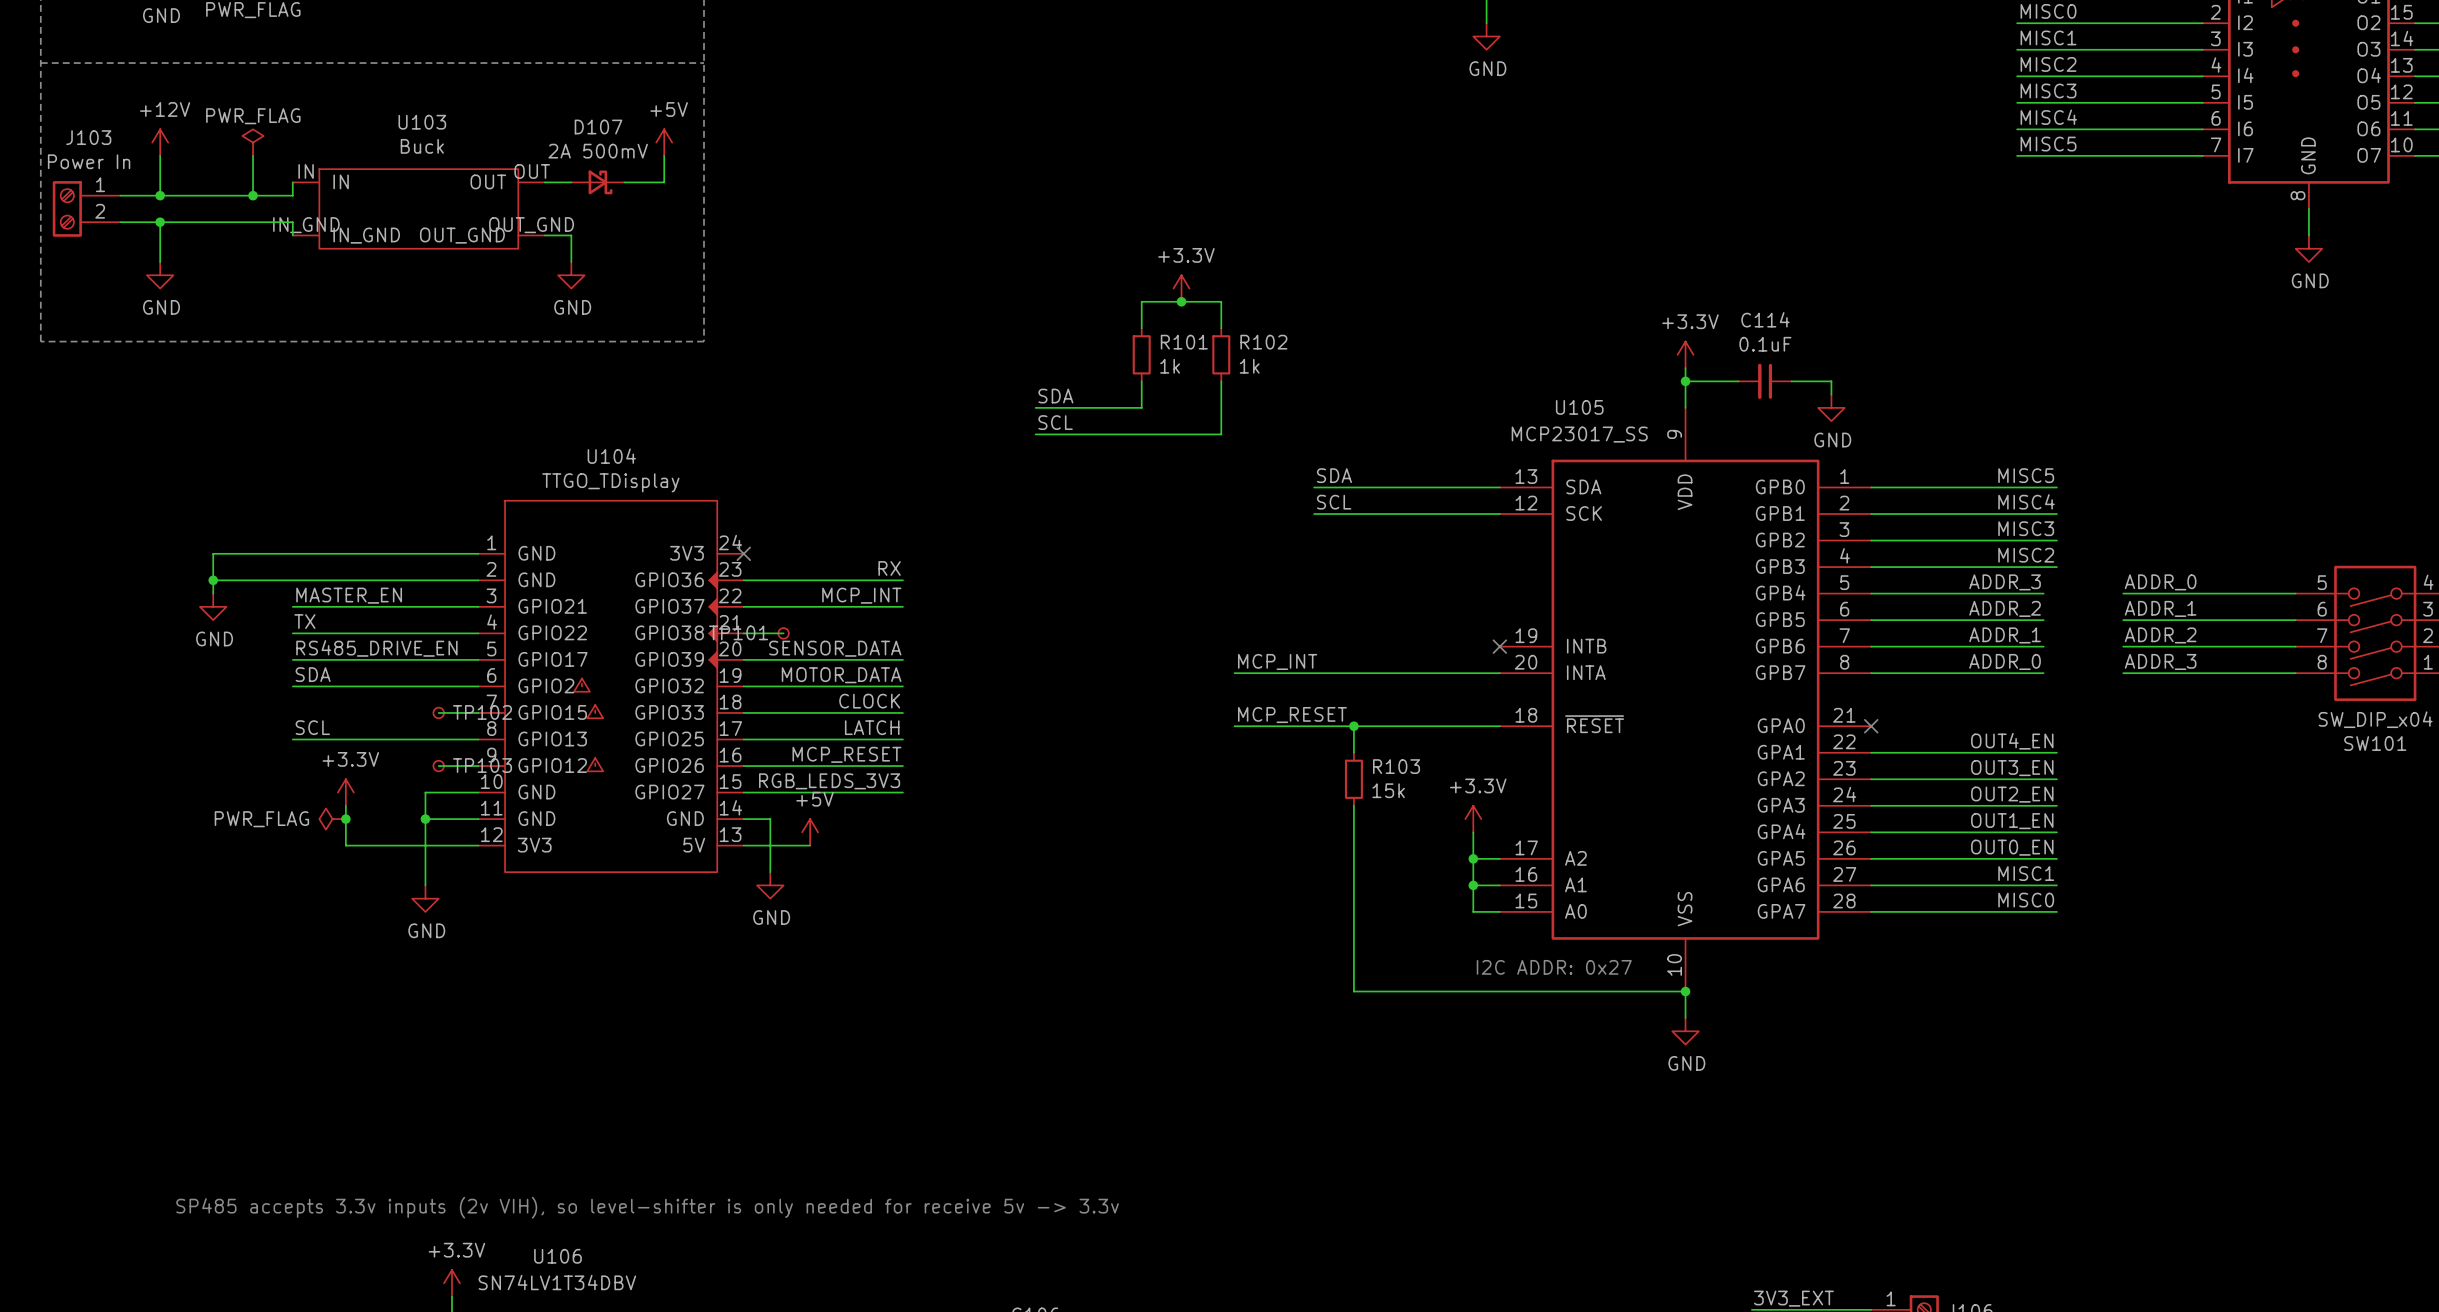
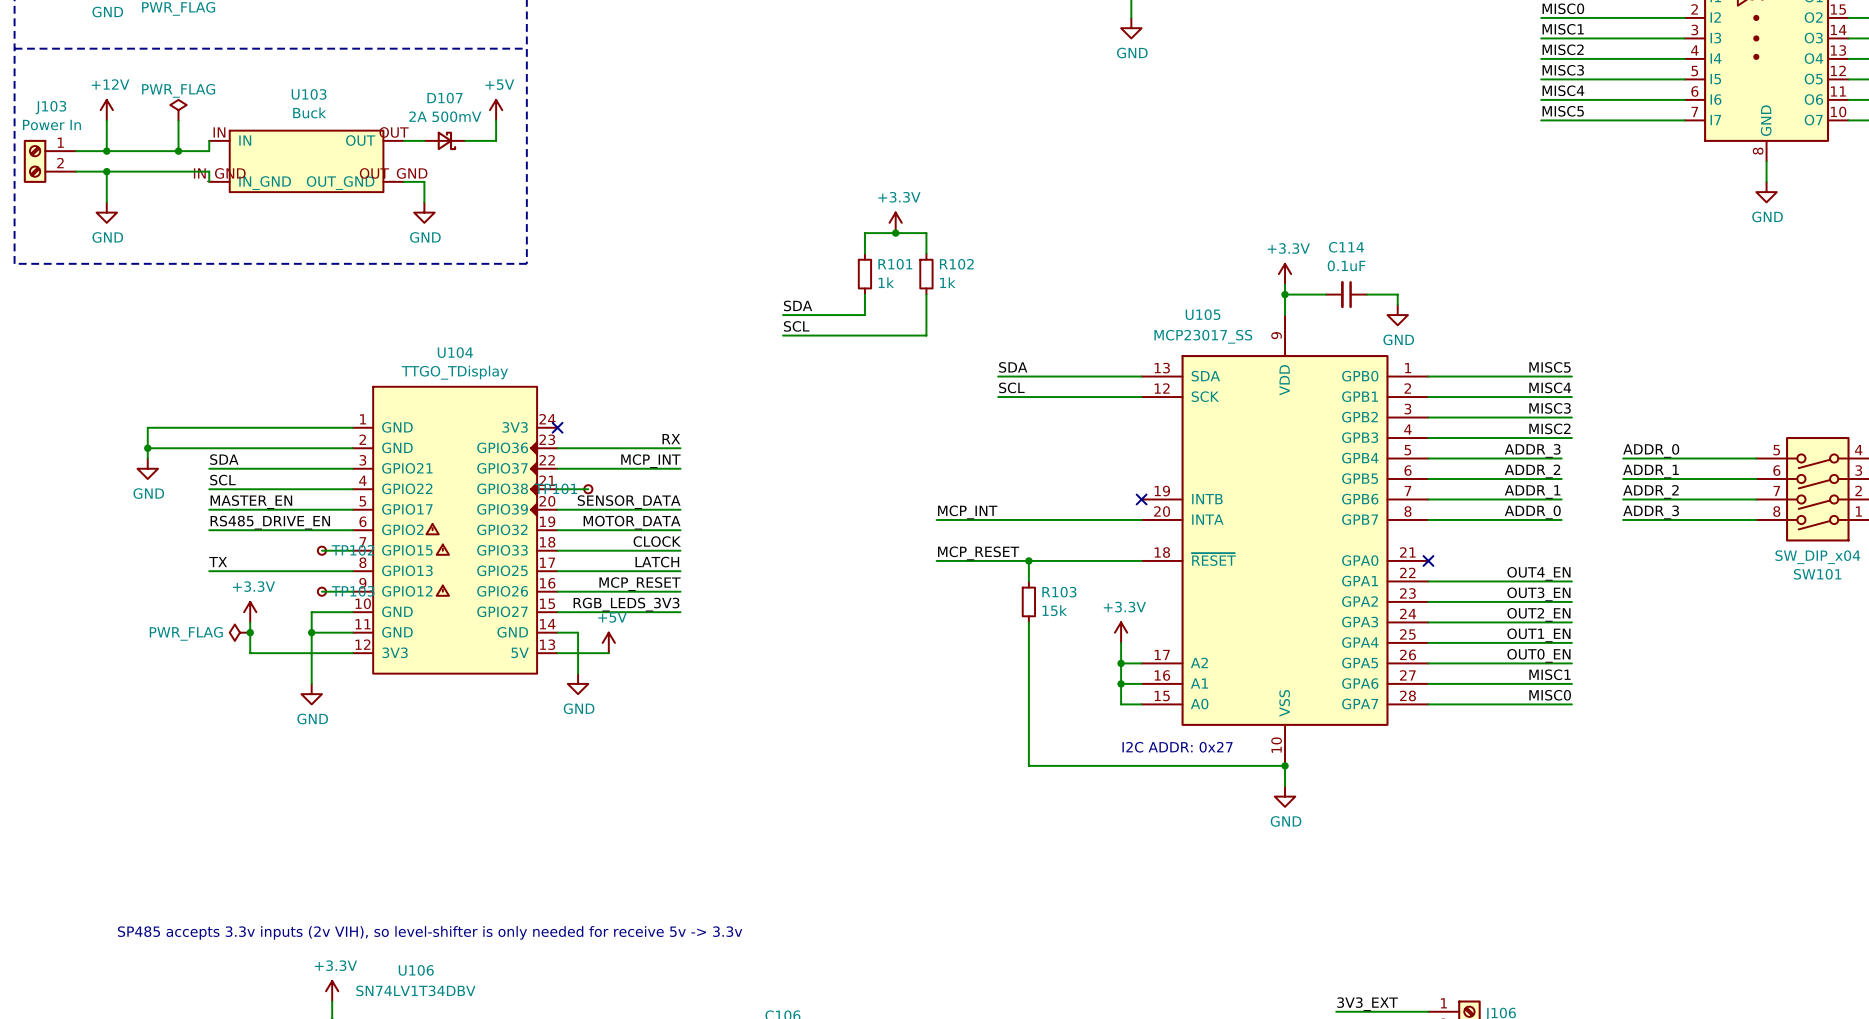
label: MASTER_EN (349, 595) -> SDA (224, 459)
label: TX (304, 621) -> SCL (222, 480)
label: RS485_DRIVE_EN (376, 648) -> MASTER_EN (251, 502)
label: SDA (313, 674) -> RS485_DRIVE_EN (270, 522)
label: SCL (312, 727) -> TX (218, 562)

